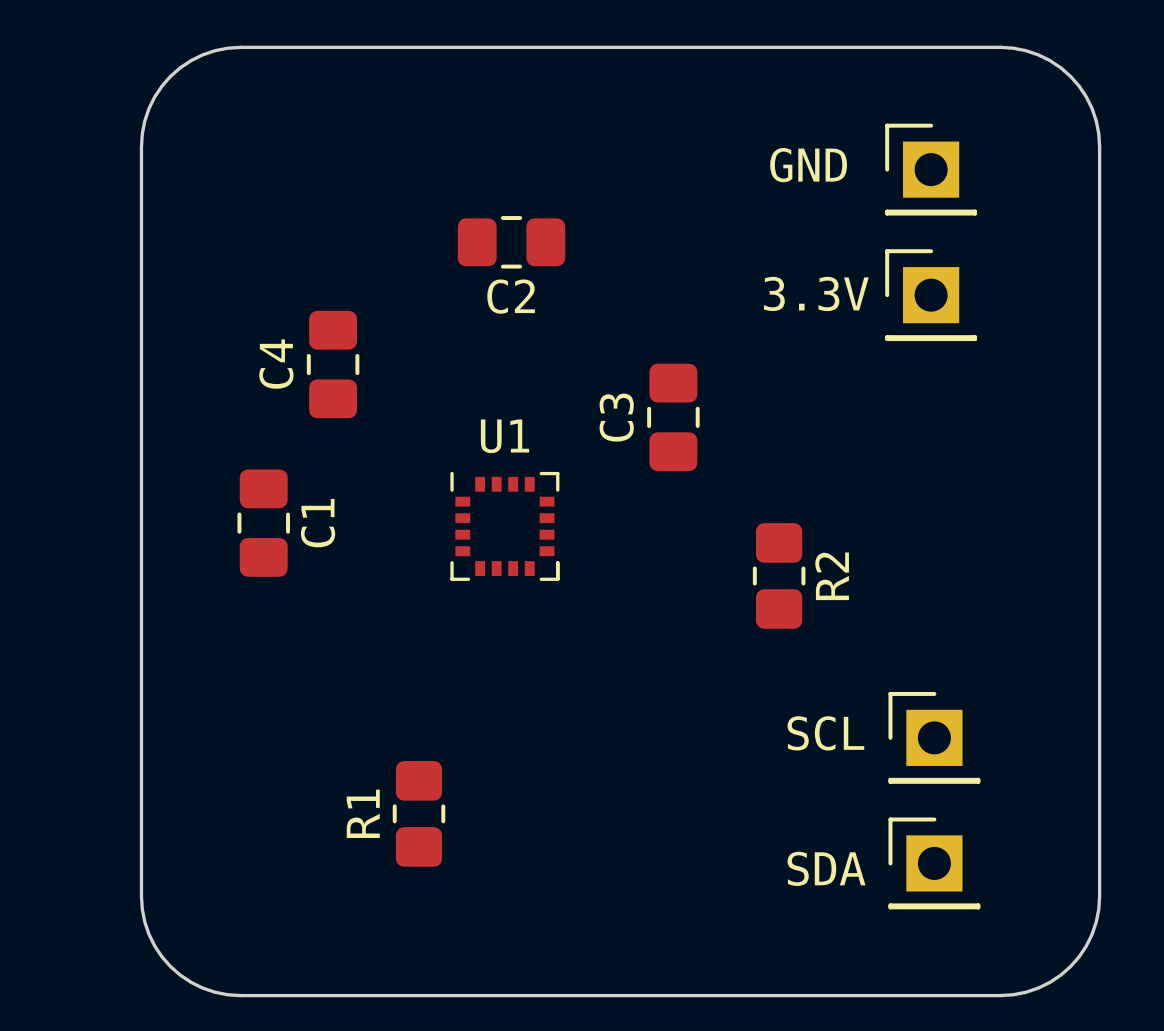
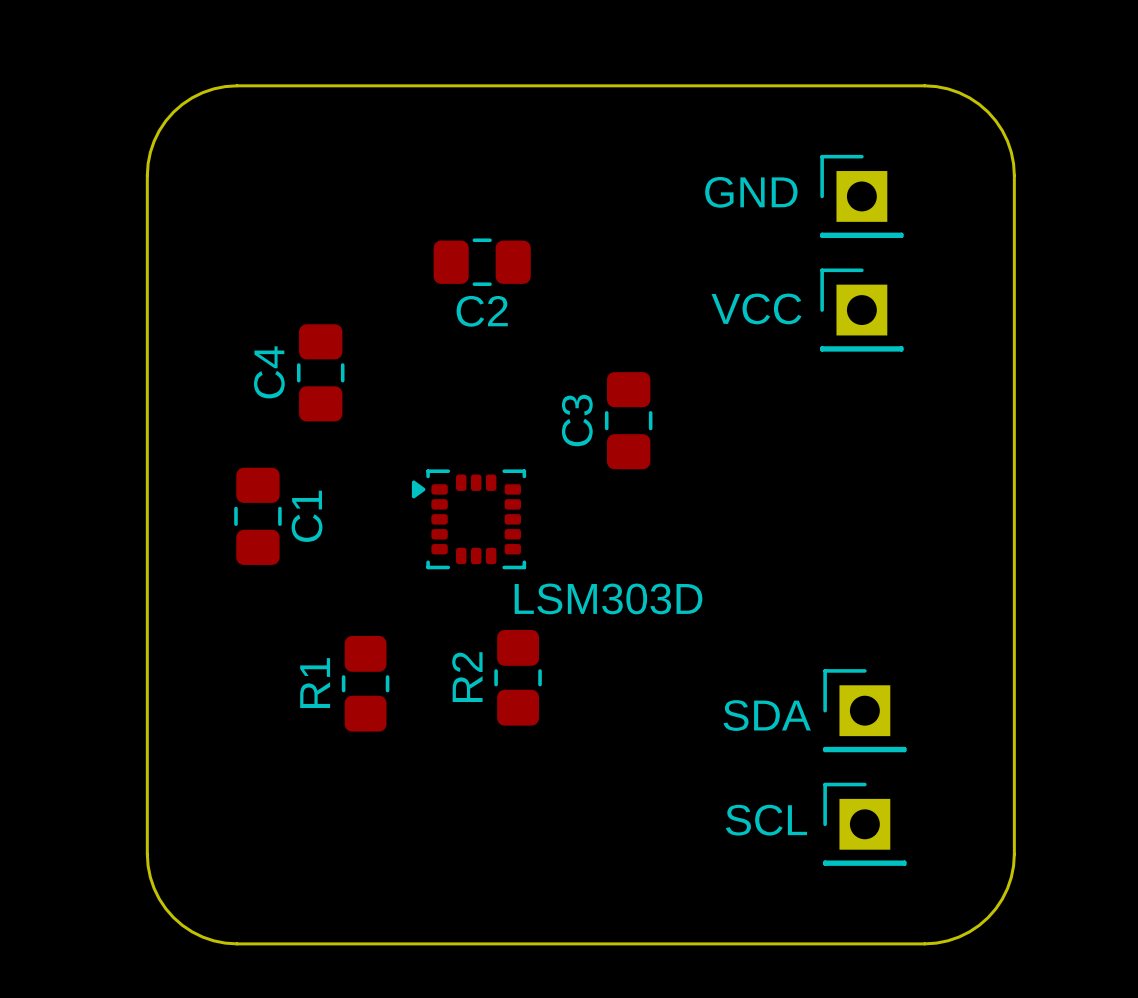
3.3V name: 3.3V (816, 293) -> VCC (756, 308)
LSM303D: none -> (469, 519)
U1: (504, 526) -> none
R2 position: (779, 575) -> (518, 677)
R2 name position: R2 (832, 576) -> R2 (467, 677)
SCL name: SCL (825, 733) -> SDA (767, 715)
R1 position: (419, 813) -> (365, 683)
SDA name: SDA (826, 868) -> SCL (766, 820)

